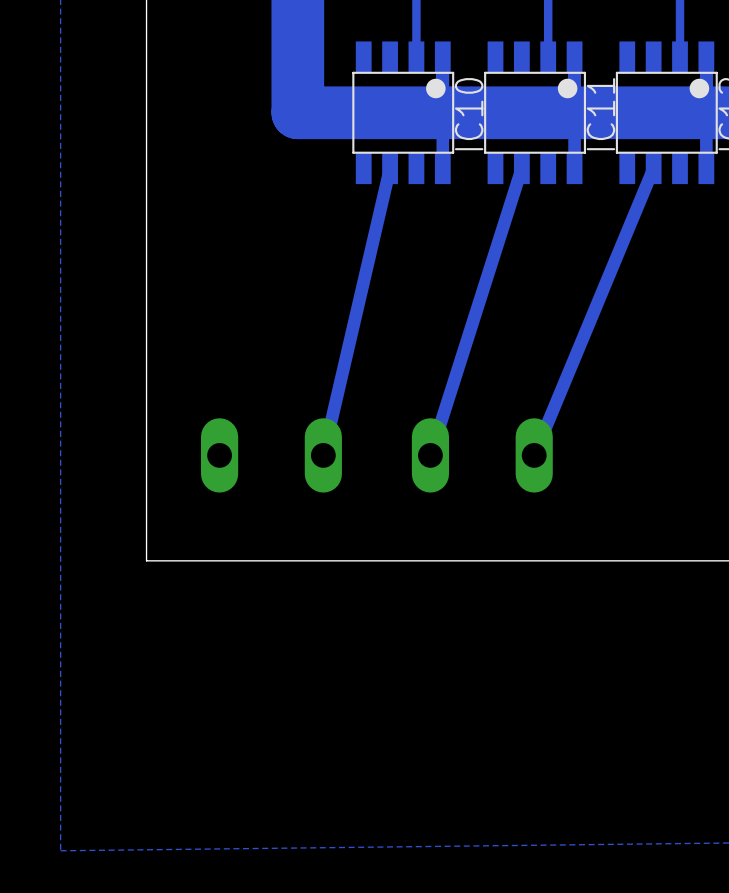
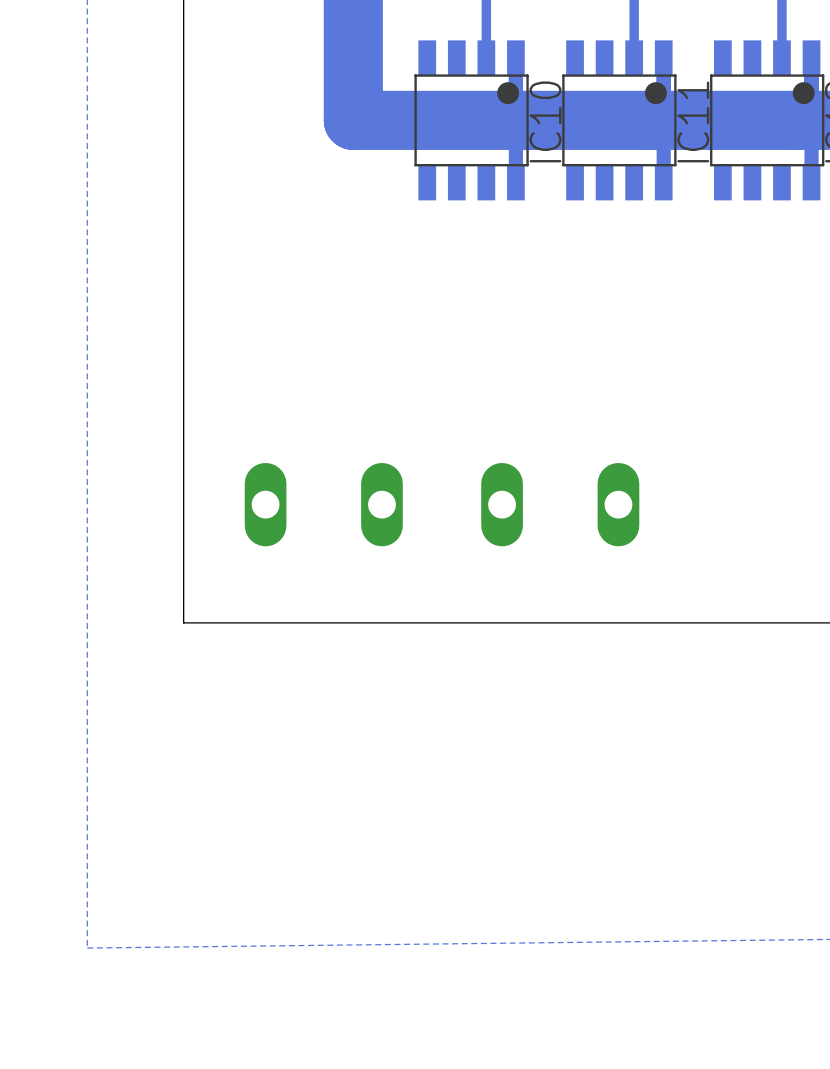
bottom track: (390, 168) (323, 455) -> none
bottom track: (521, 168) (430, 455) -> none
bottom track: (653, 168) (534, 455) -> none

